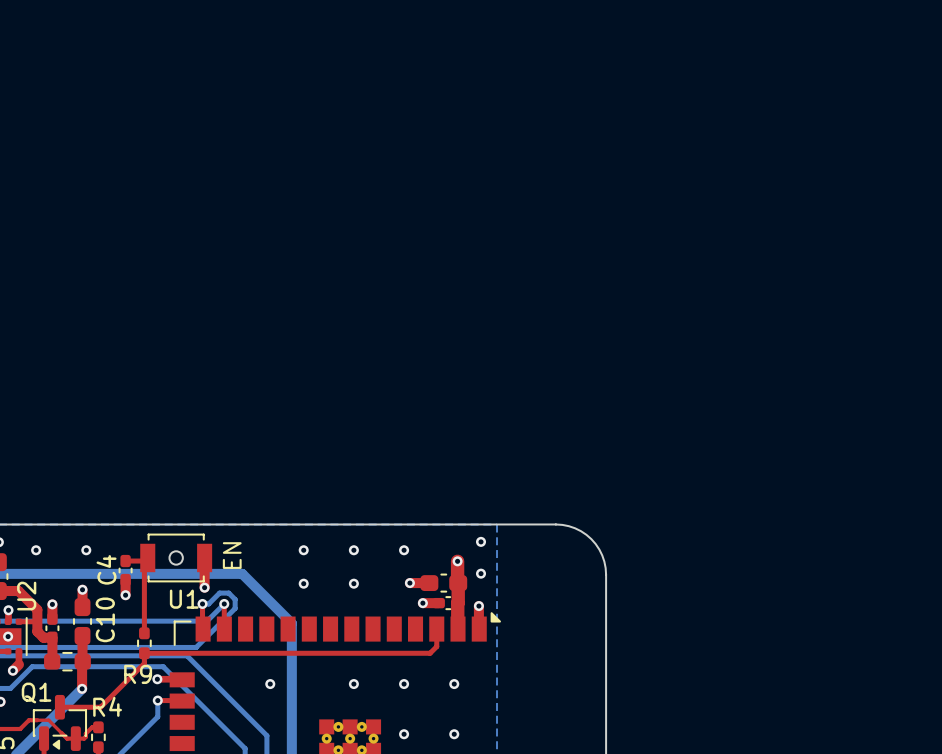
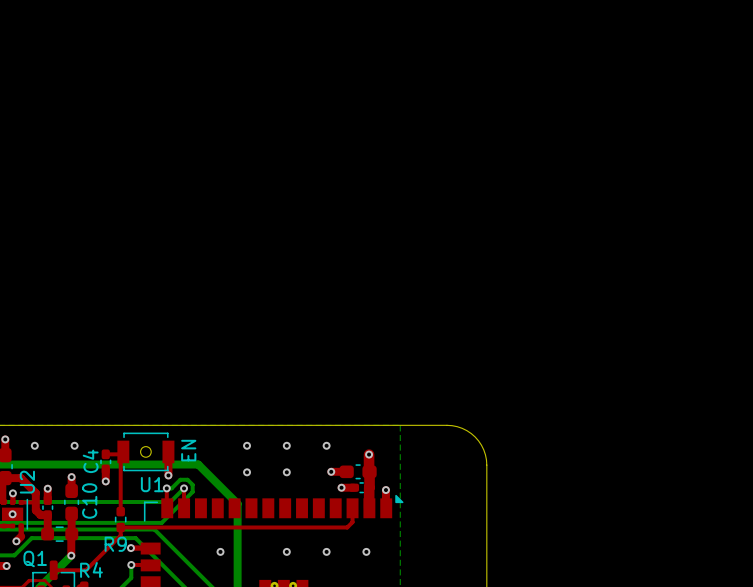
via: (481, 541) -> none
text: EN (232, 555) -> none
EN name: none -> EN (188, 450)
via: (481, 573) -> none

